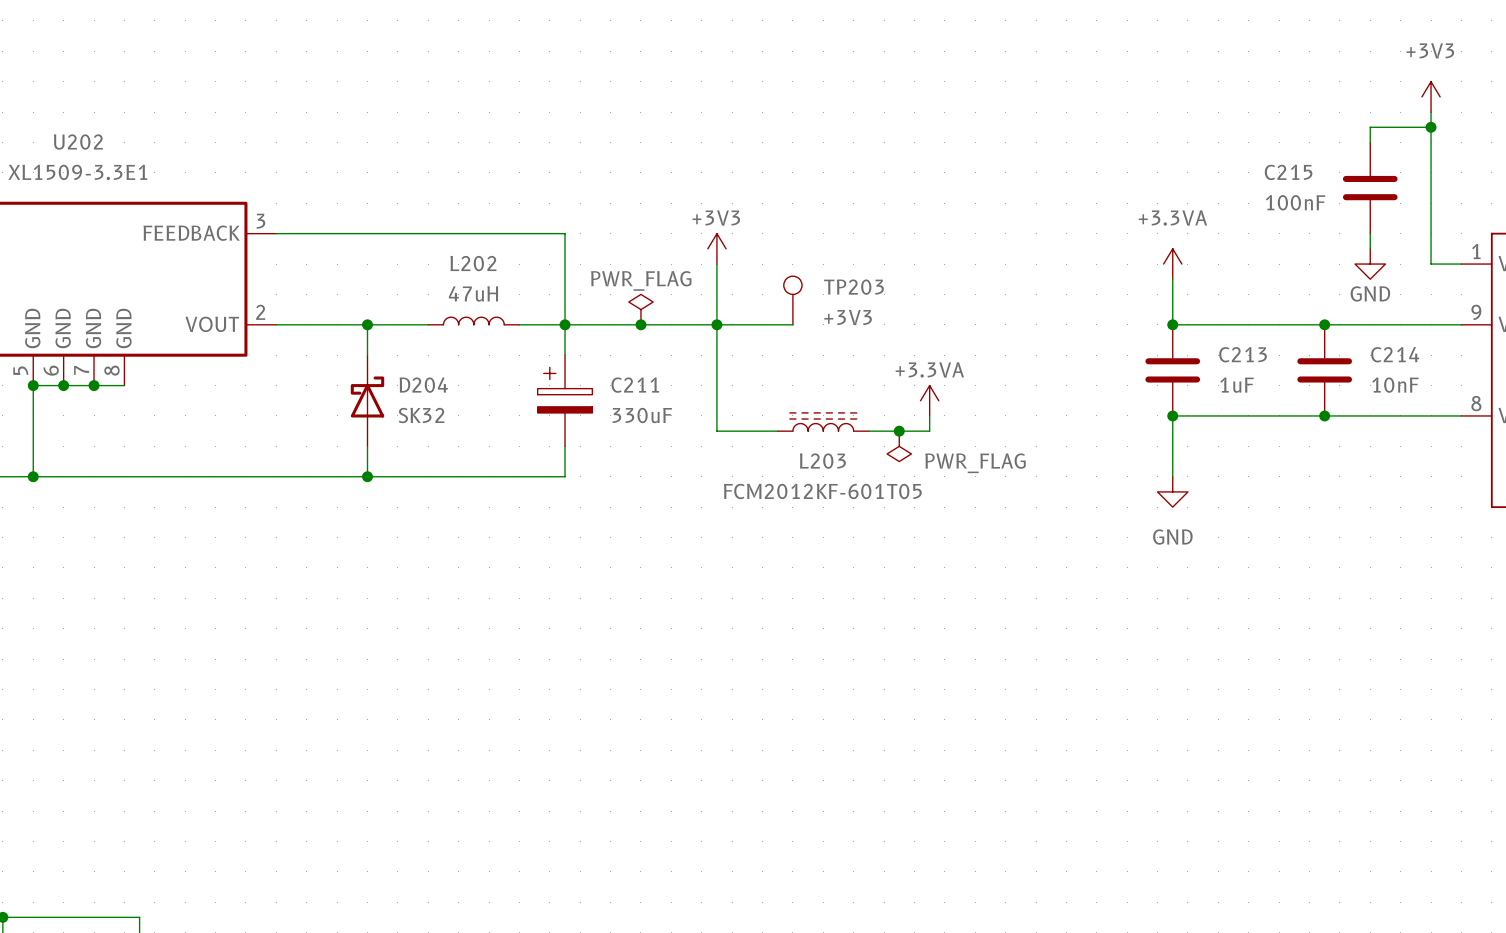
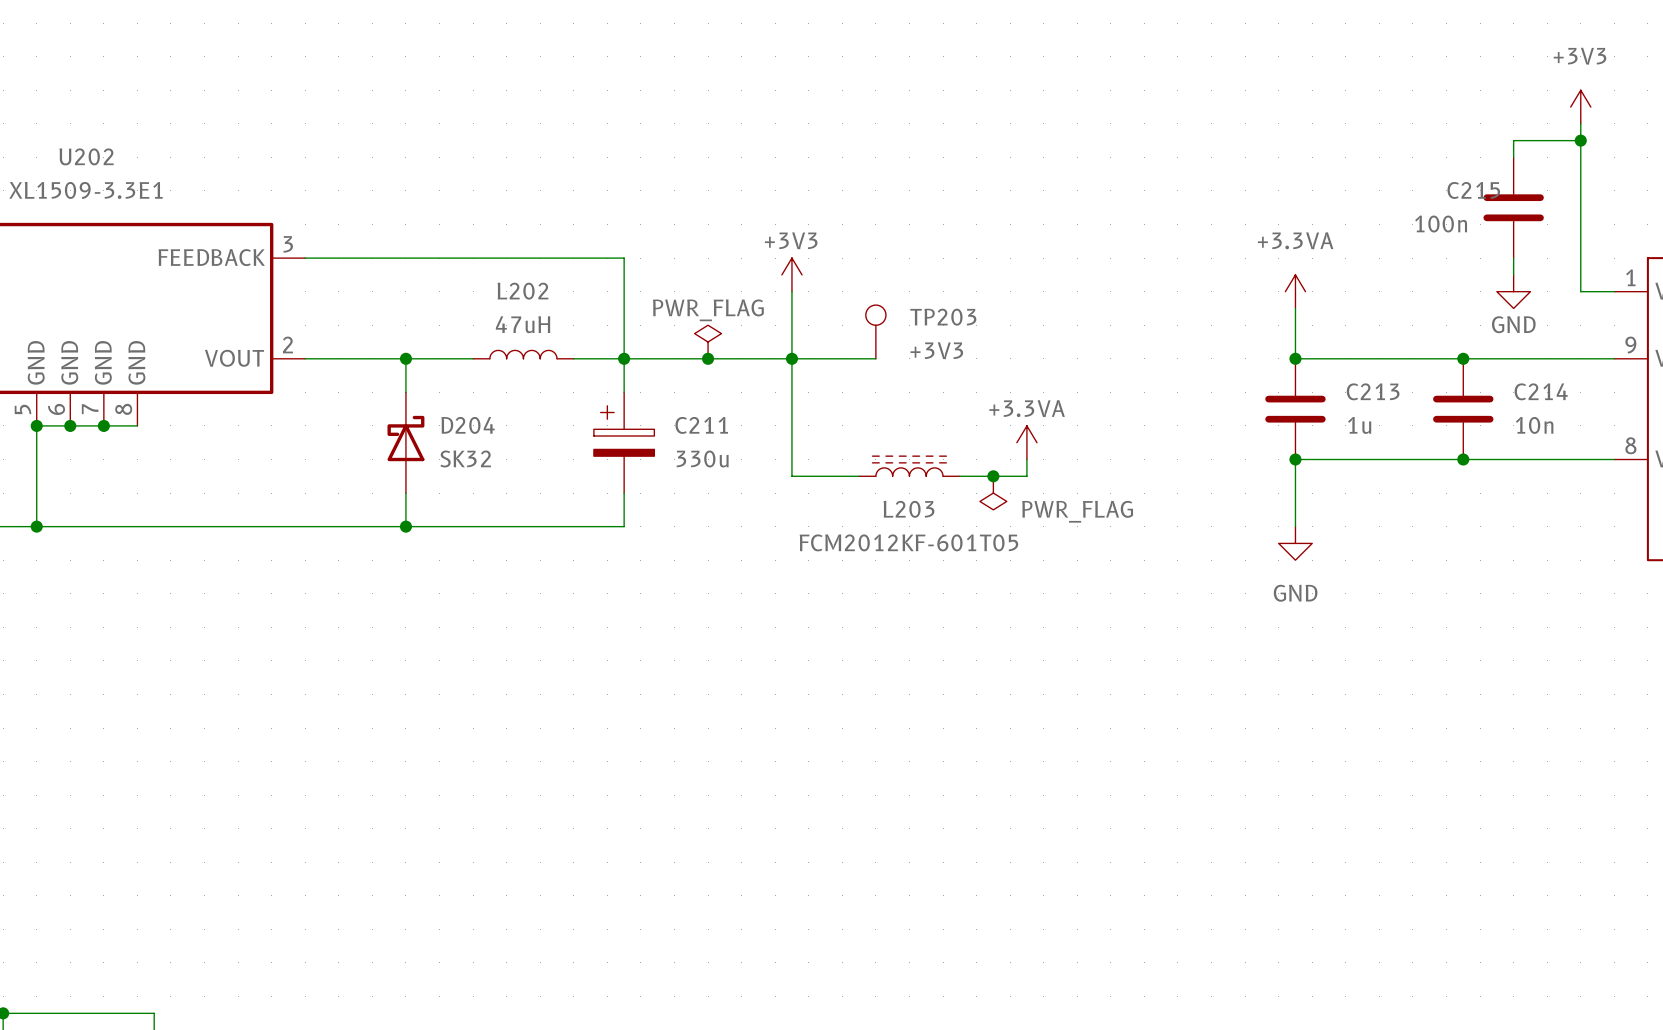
C215 name position: C215 (1288, 172) -> C215 (1473, 190)
C215 value: 100nF (1295, 202) -> 100n (1441, 224)
C213 value: 1uF (1237, 385) -> 1u (1359, 425)
C214 value: 10nF (1395, 385) -> 10n (1534, 425)
C211 value: 330uF (642, 415) -> 330u (702, 458)

